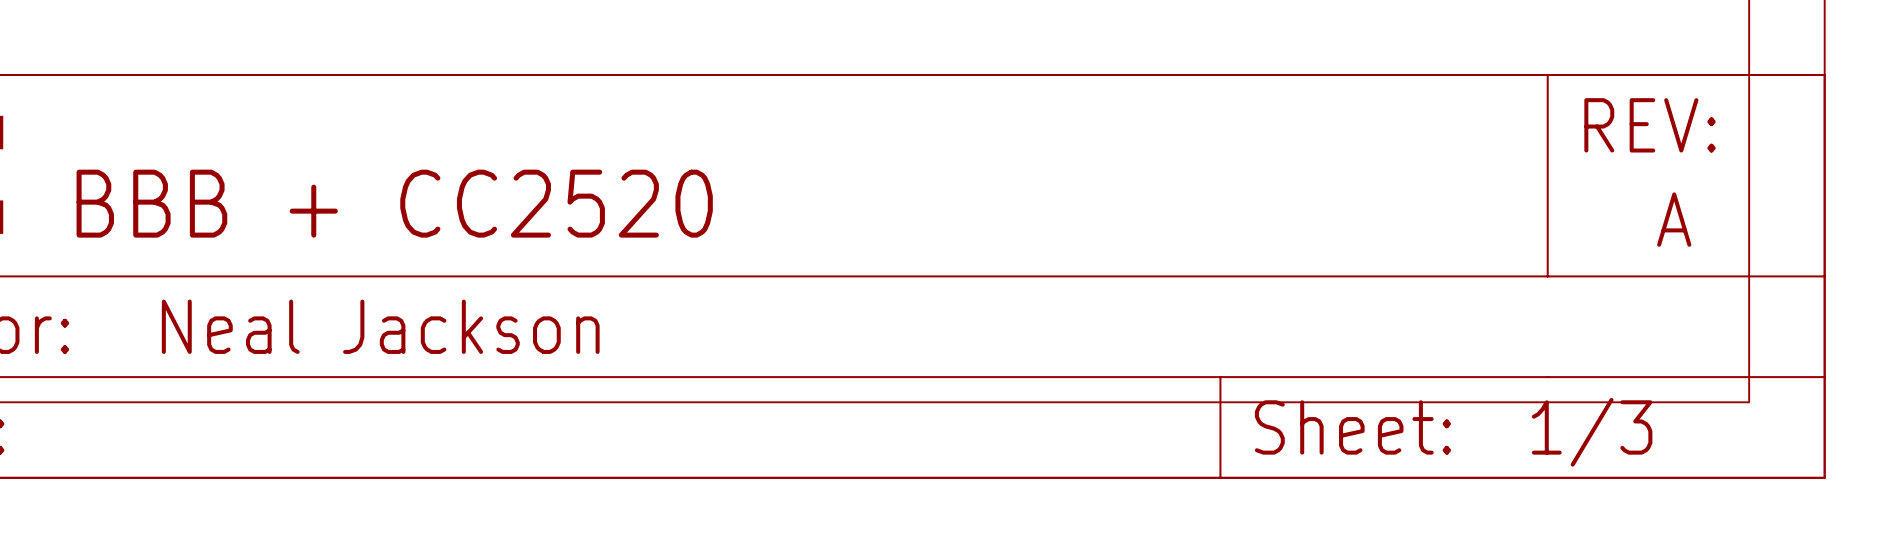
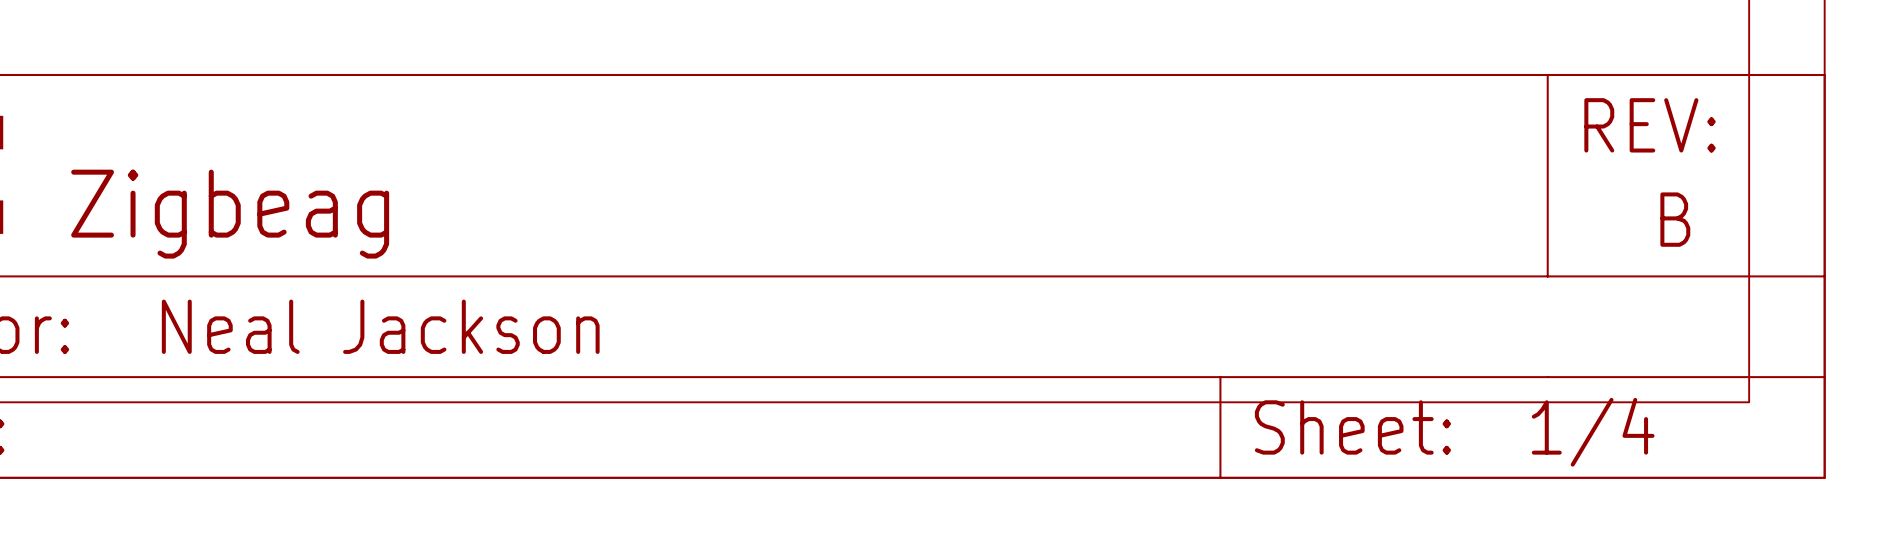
part text: BBB + CC2520 (394, 203) -> Zigbeag (230, 214)
part text: A (1674, 219) -> B (1675, 219)
part text: 1/3 (1592, 432) -> 1/4 (1593, 432)

